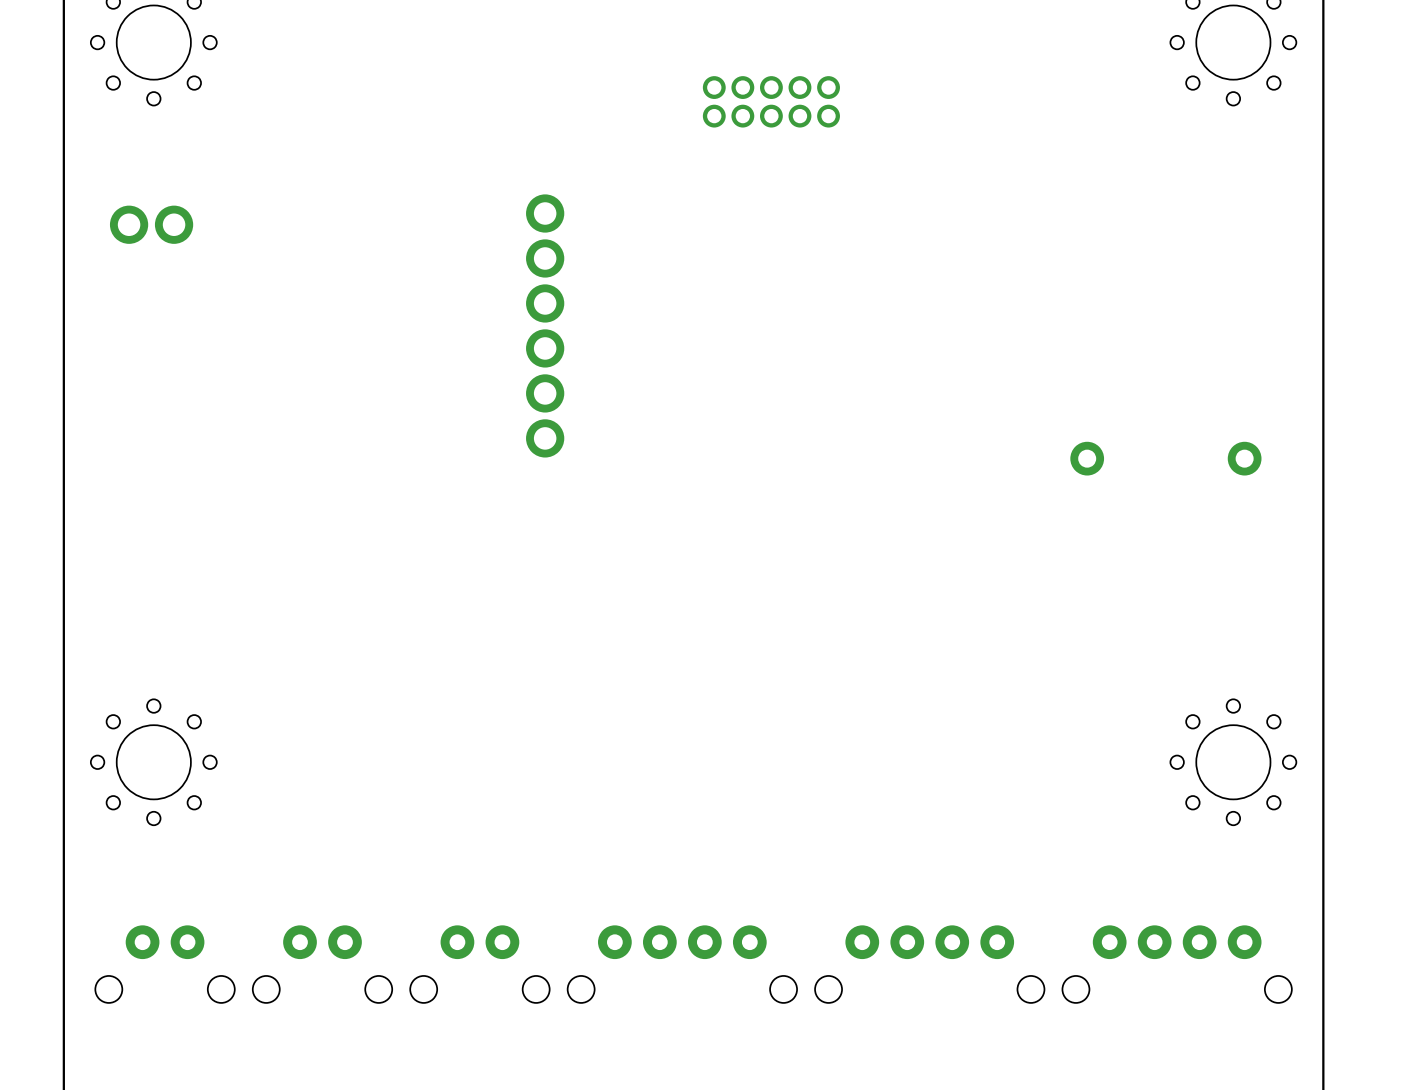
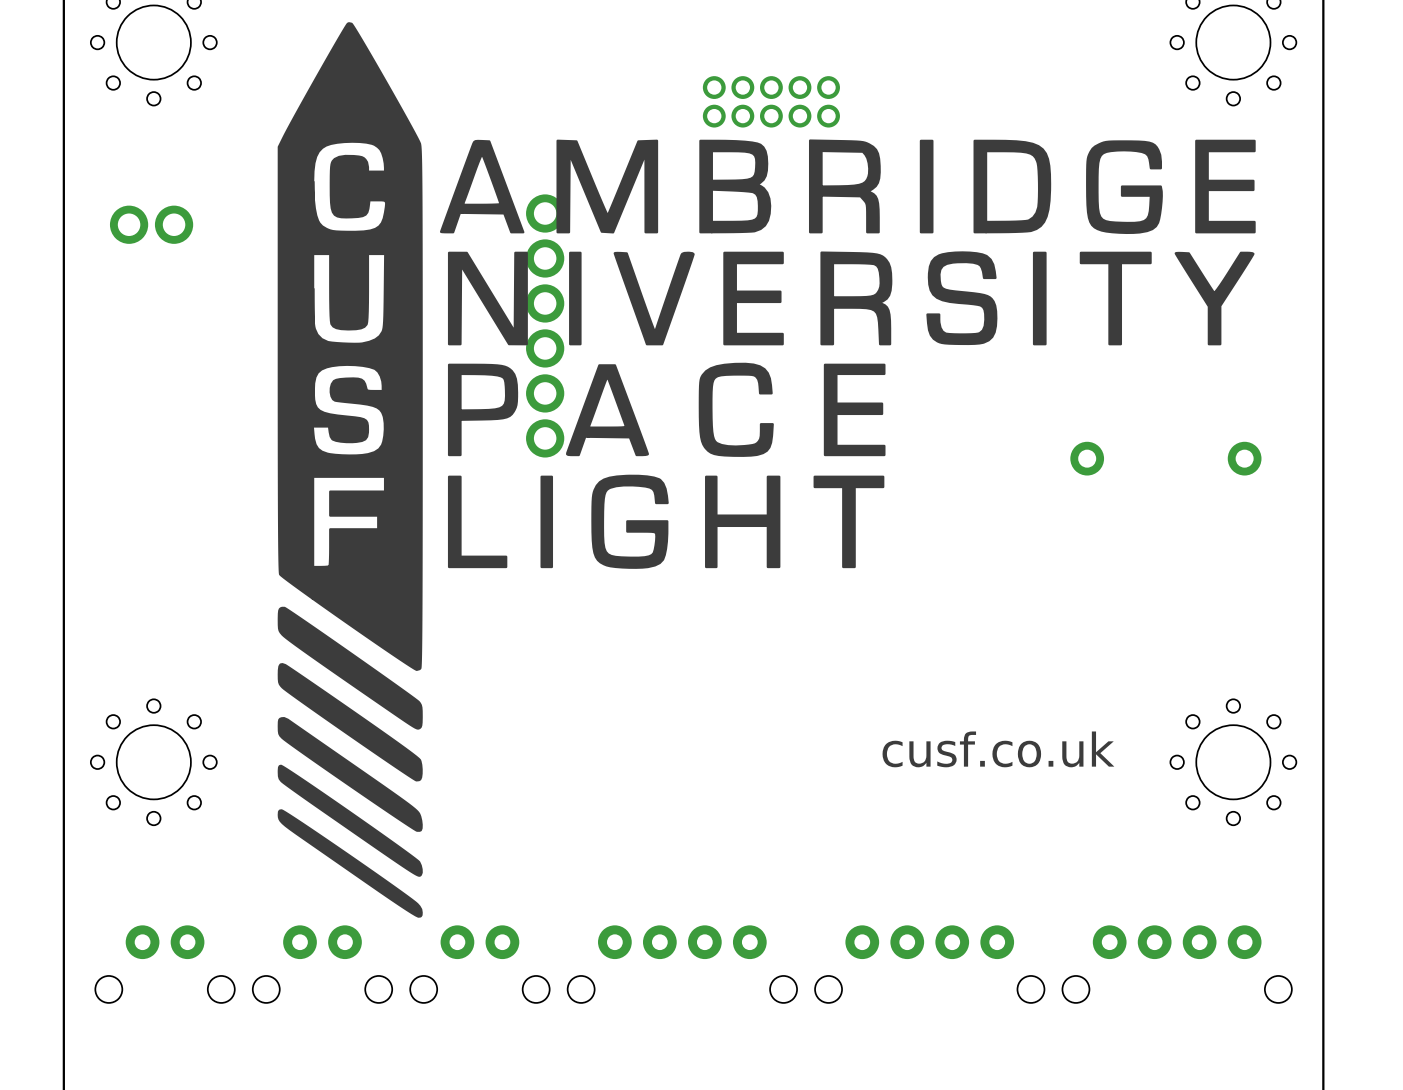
drawing: none -> [277, 22, 1256, 918]
text: none -> cusf.co.uk (998, 749)

